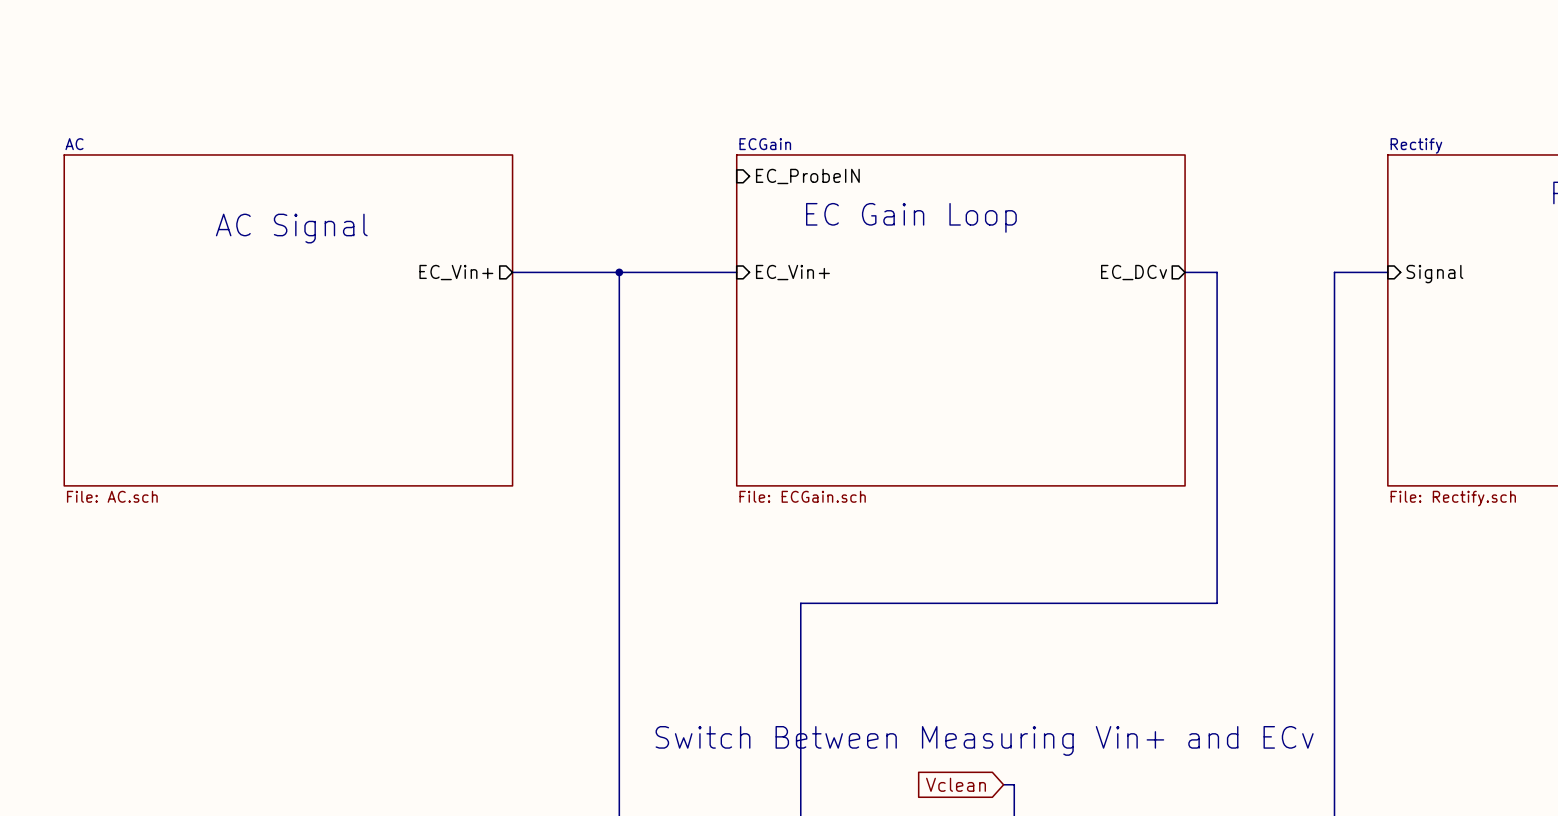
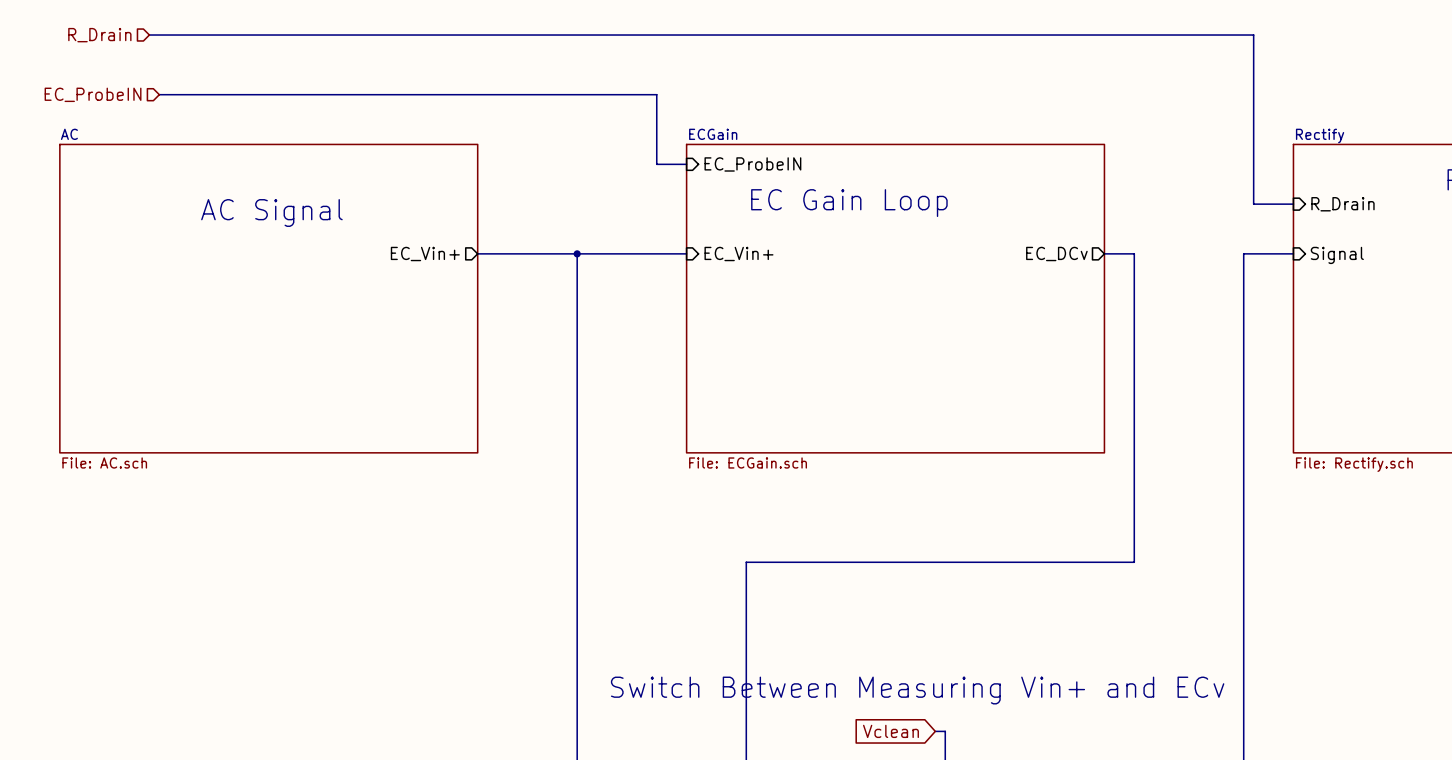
hierarchical label: none -> R_Drain (99, 35)
wire: none -> (149, 35) (1253, 35) (1253, 204) (1293, 204)
hierarchical label: none -> EC_ProbeIN (93, 94)
wire: none -> (159, 94) (656, 94) (656, 164) (686, 164)
sheet pin: none -> R_Drain (1342, 204)

